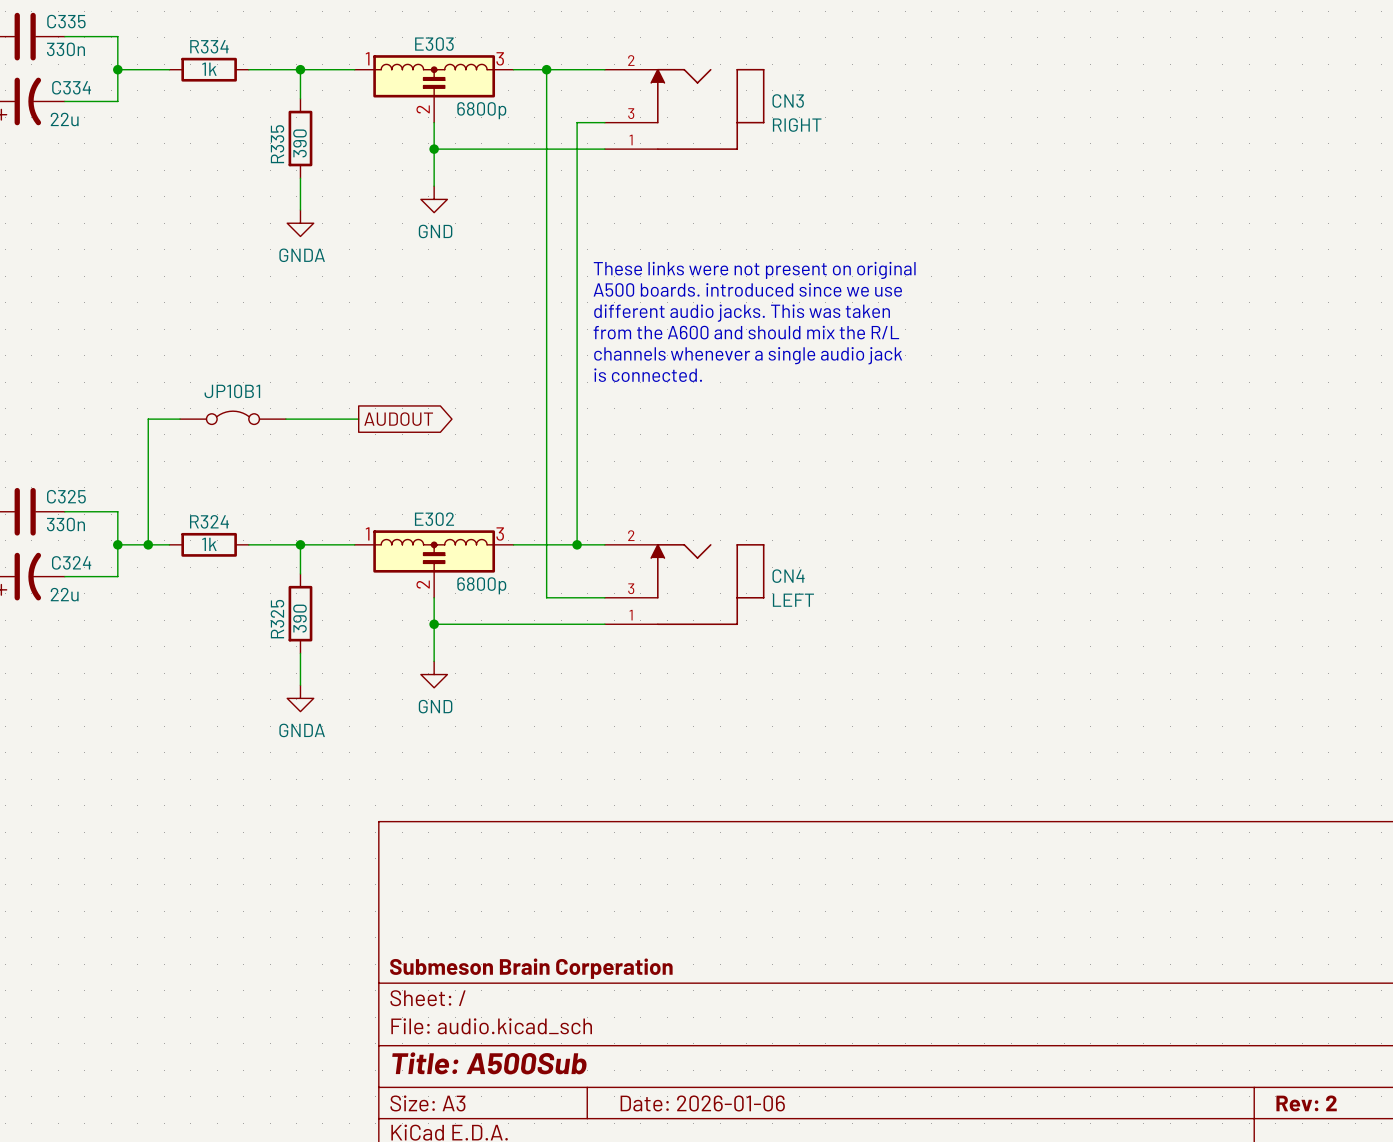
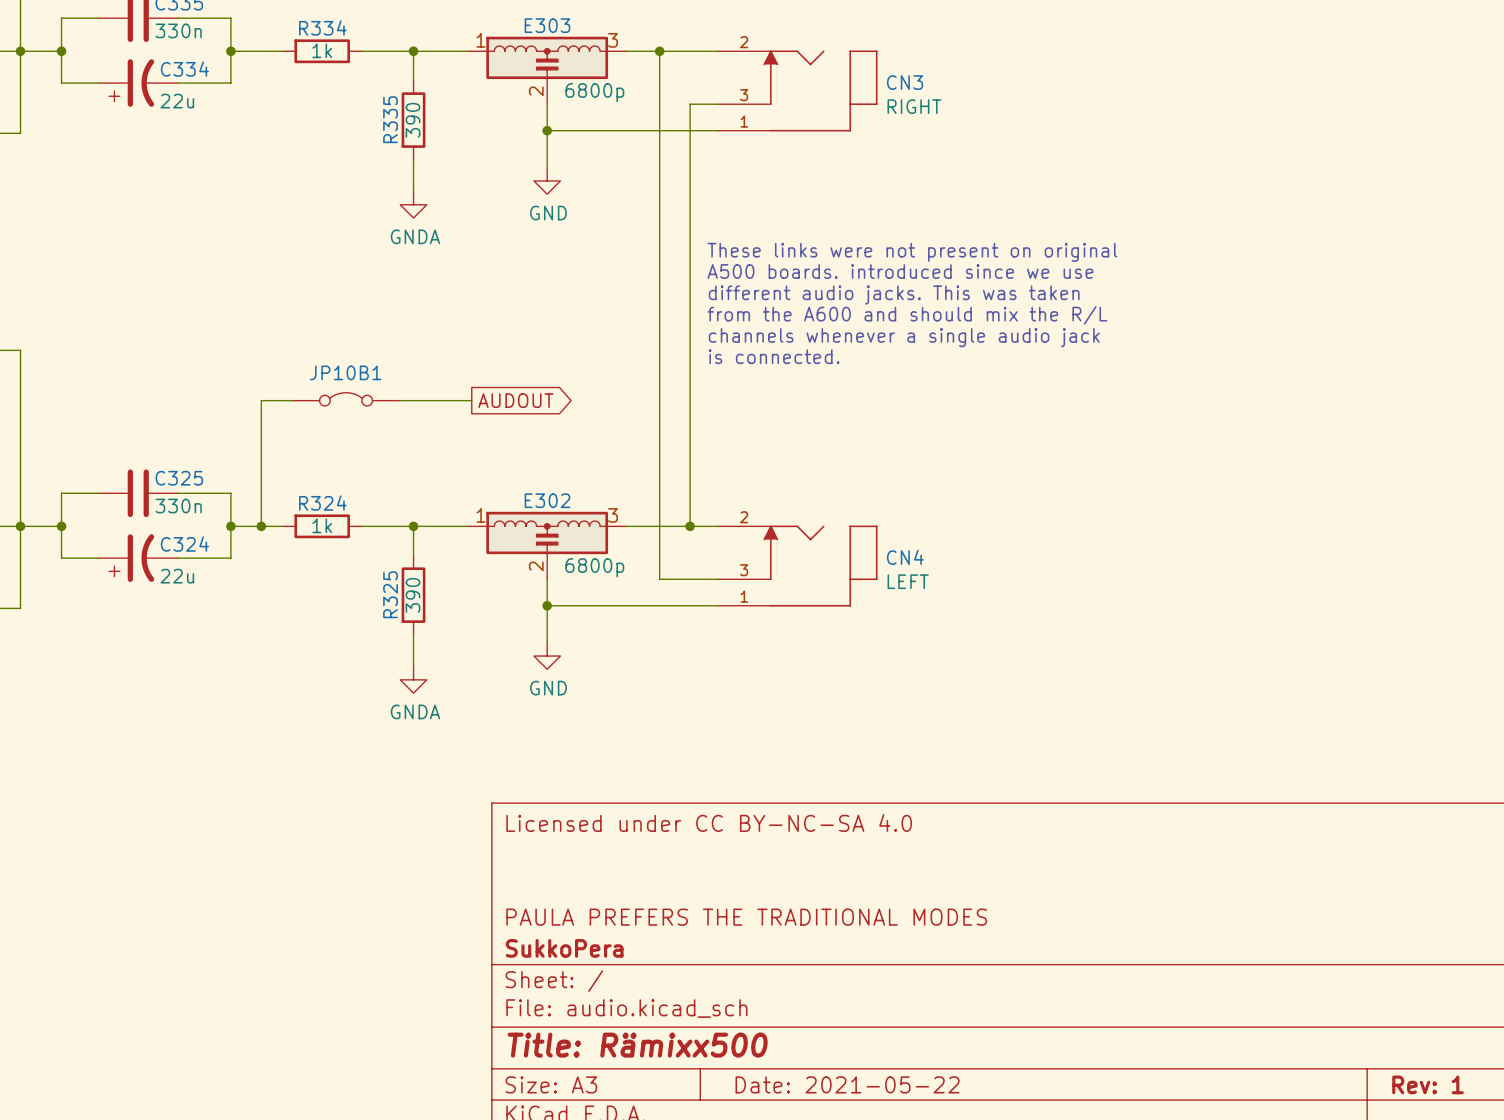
title block: none -> Licensed under CC BY-NC-SA 4.0 (709, 822)
title block: none -> PAULA PREFERS THE TRADITIONAL MODES (746, 917)
title block: Submeson Brain Corperation (531, 968) -> SukkoPera (564, 948)
title block: Title: A500Sub (489, 1063) -> Title: Rämixx500 (637, 1045)
title block: Date: 2026-01-06 (702, 1103) -> Date: 2021-05-22 (847, 1084)
title block: Rev: 2 (1306, 1103) -> Rev: 1 (1428, 1084)

